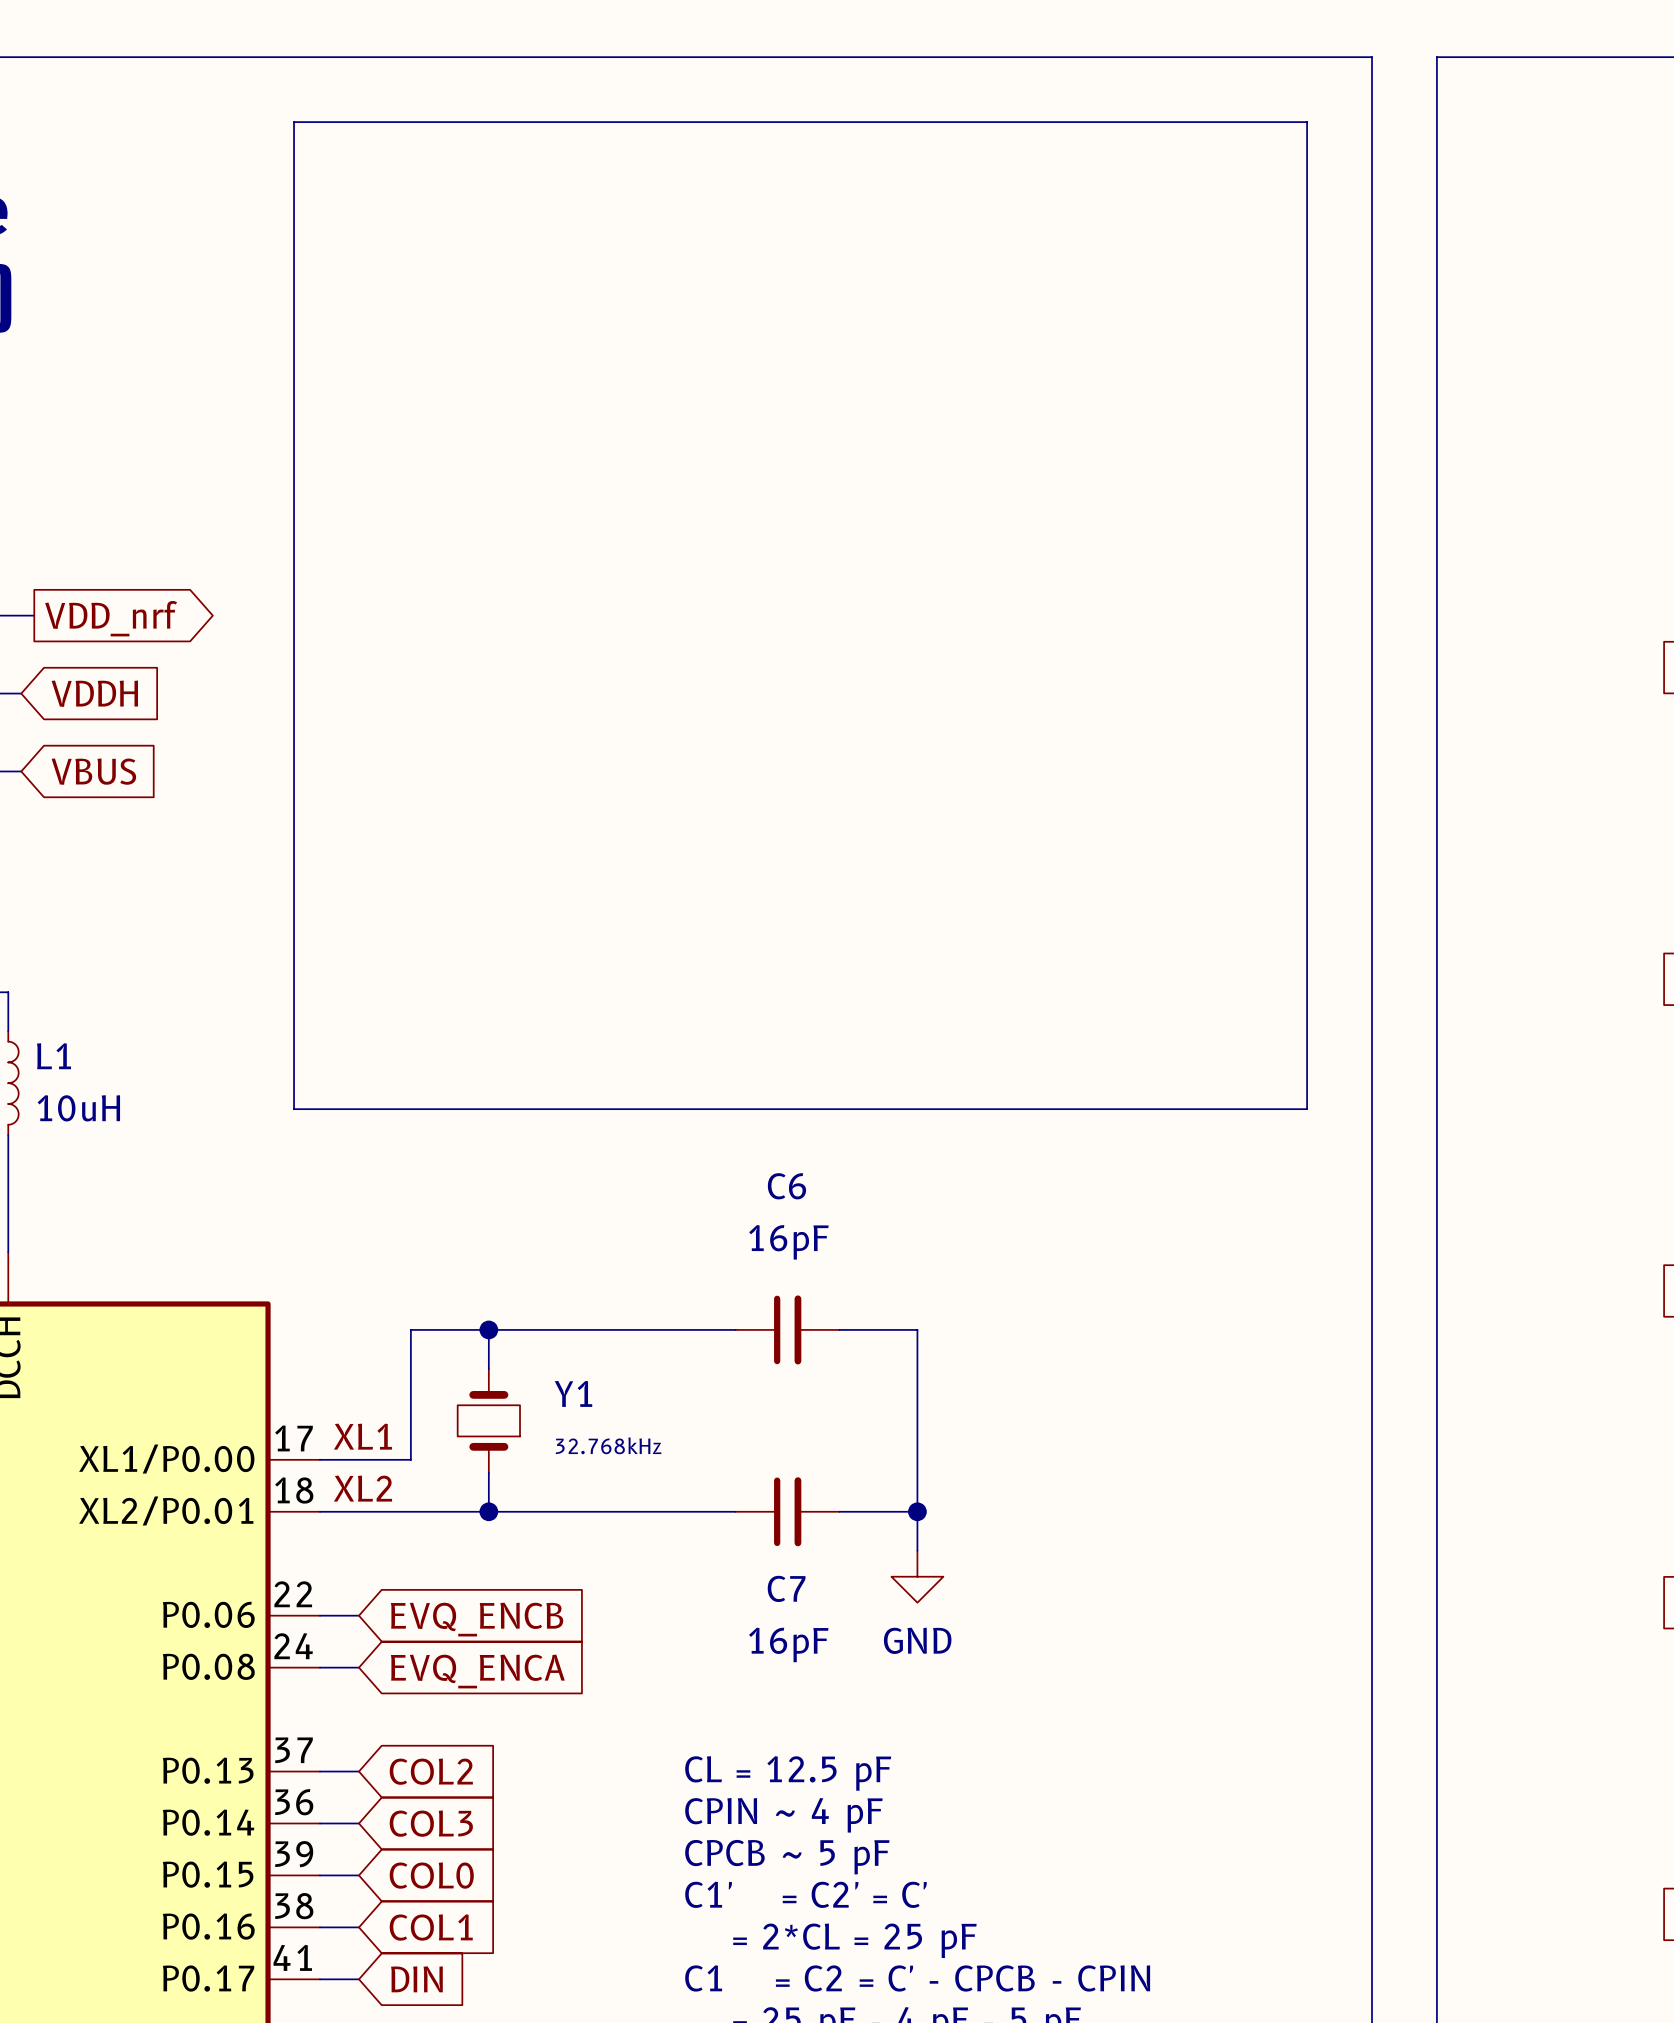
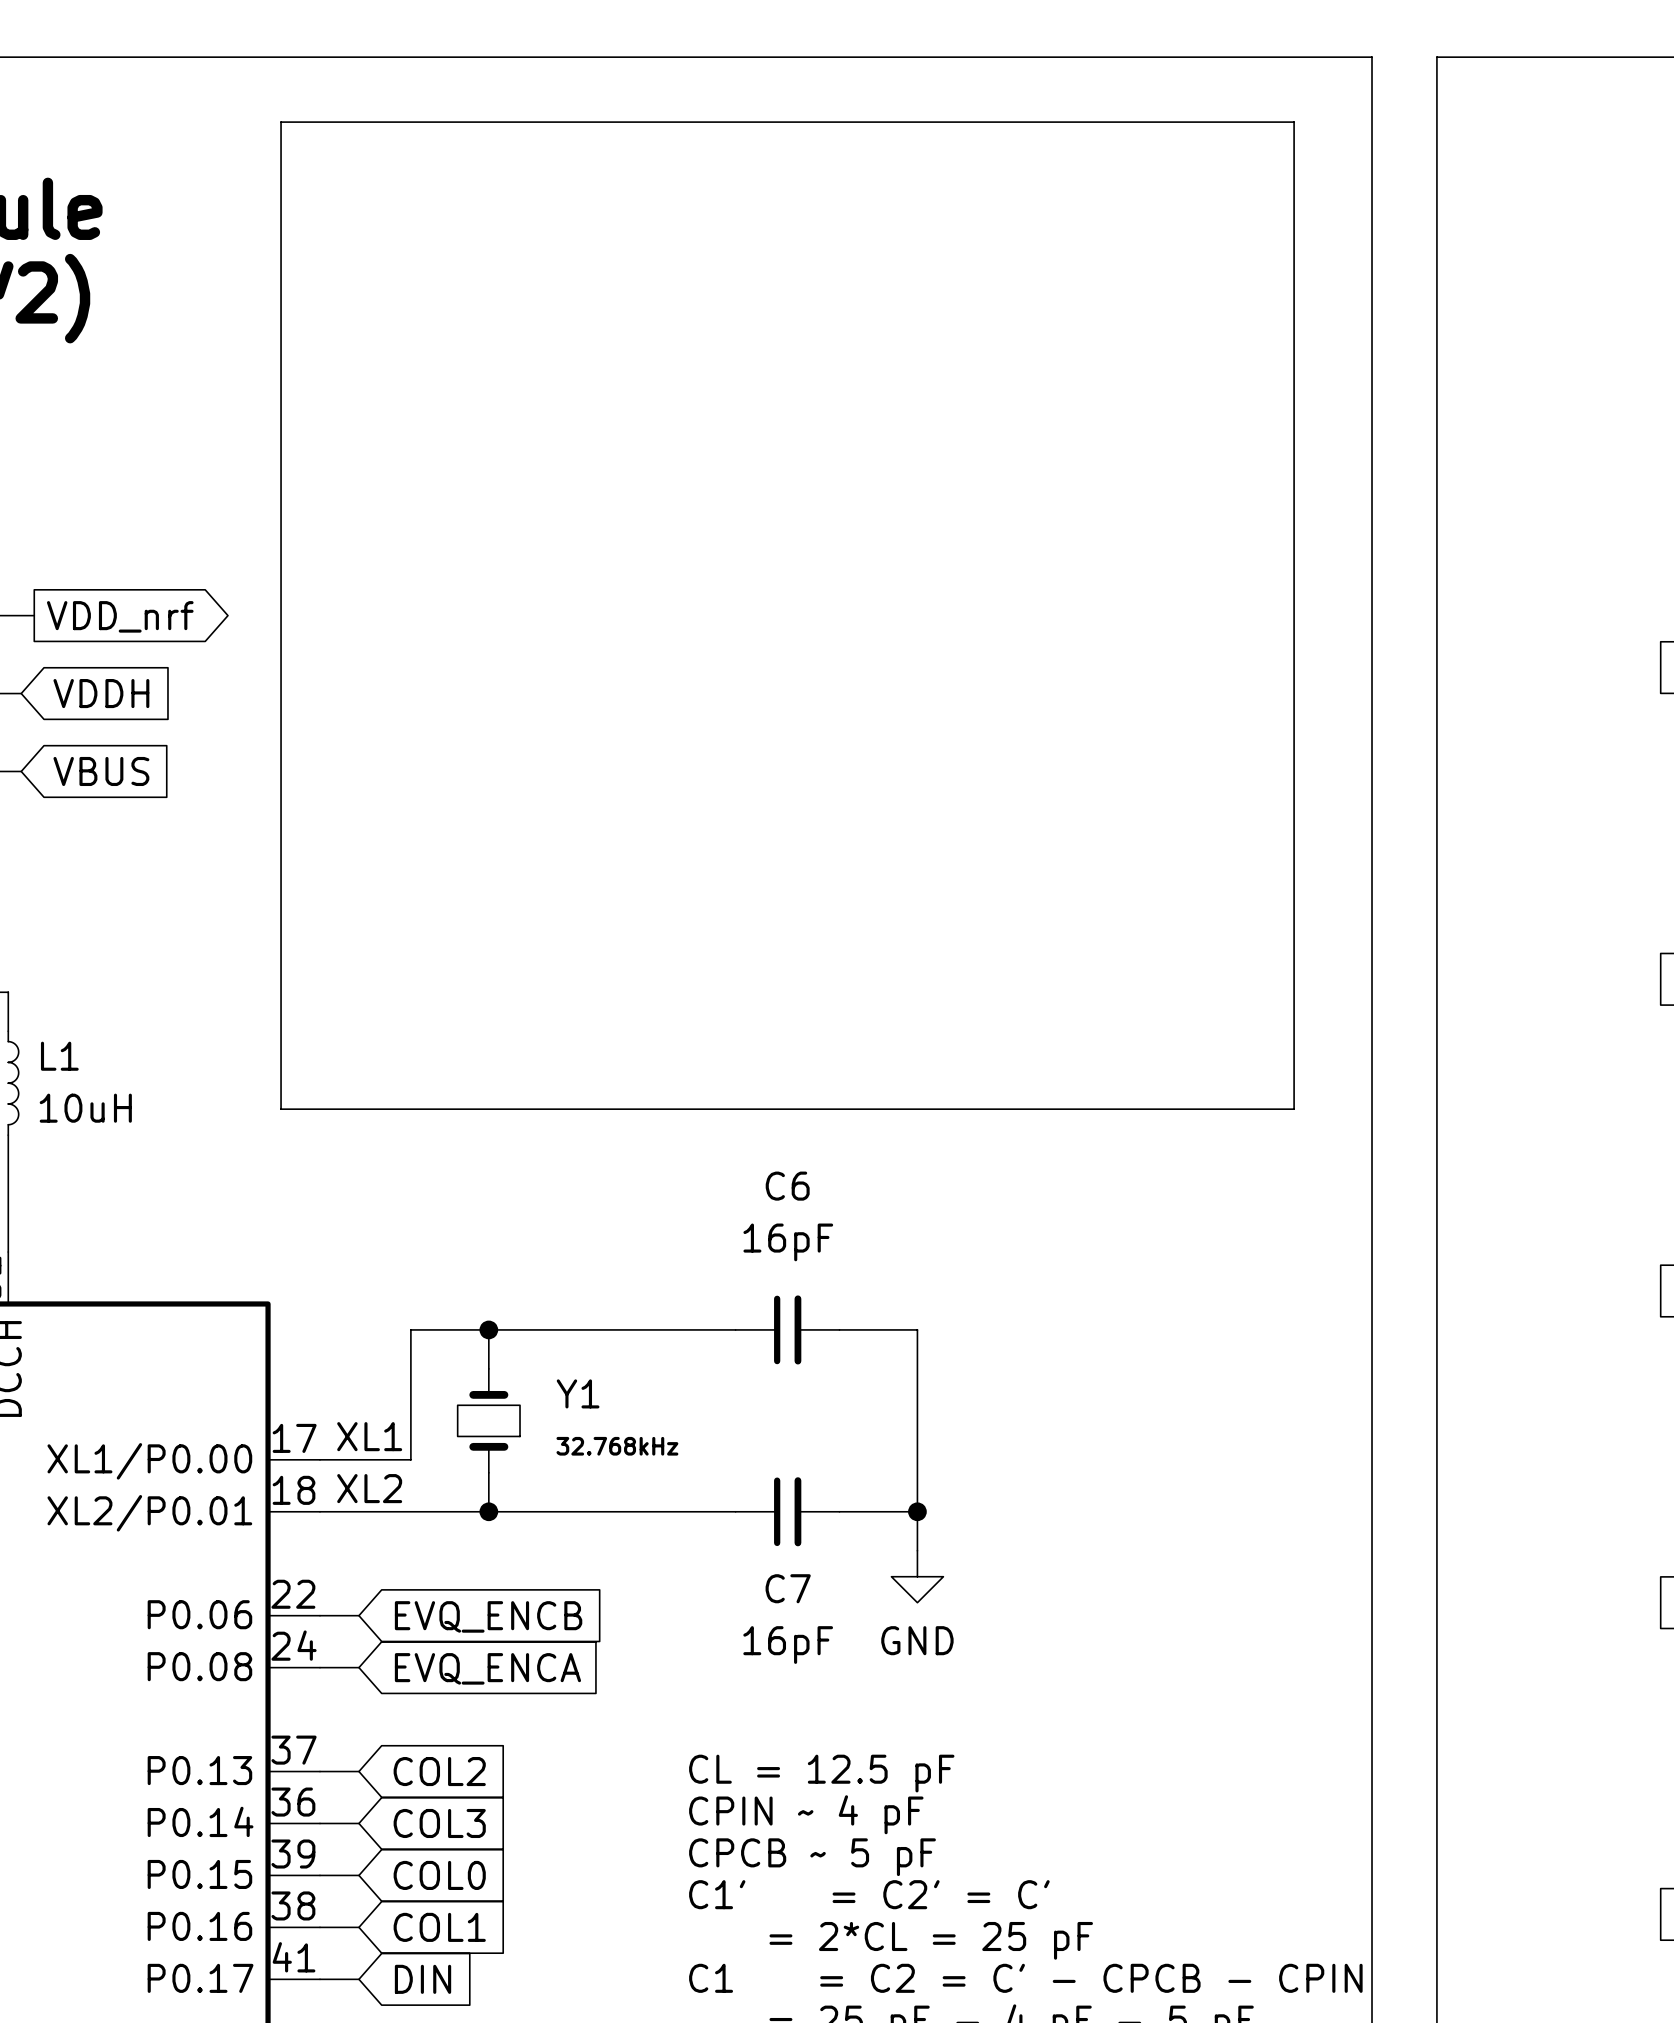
line: (294, 122) (294, 1109) -> (294, 122) (281, 122) (281, 1109) (294, 1109)
line: (1294, 122) (1307, 122) (1307, 1109) (1294, 1109) -> (1294, 122) (1294, 1109)

